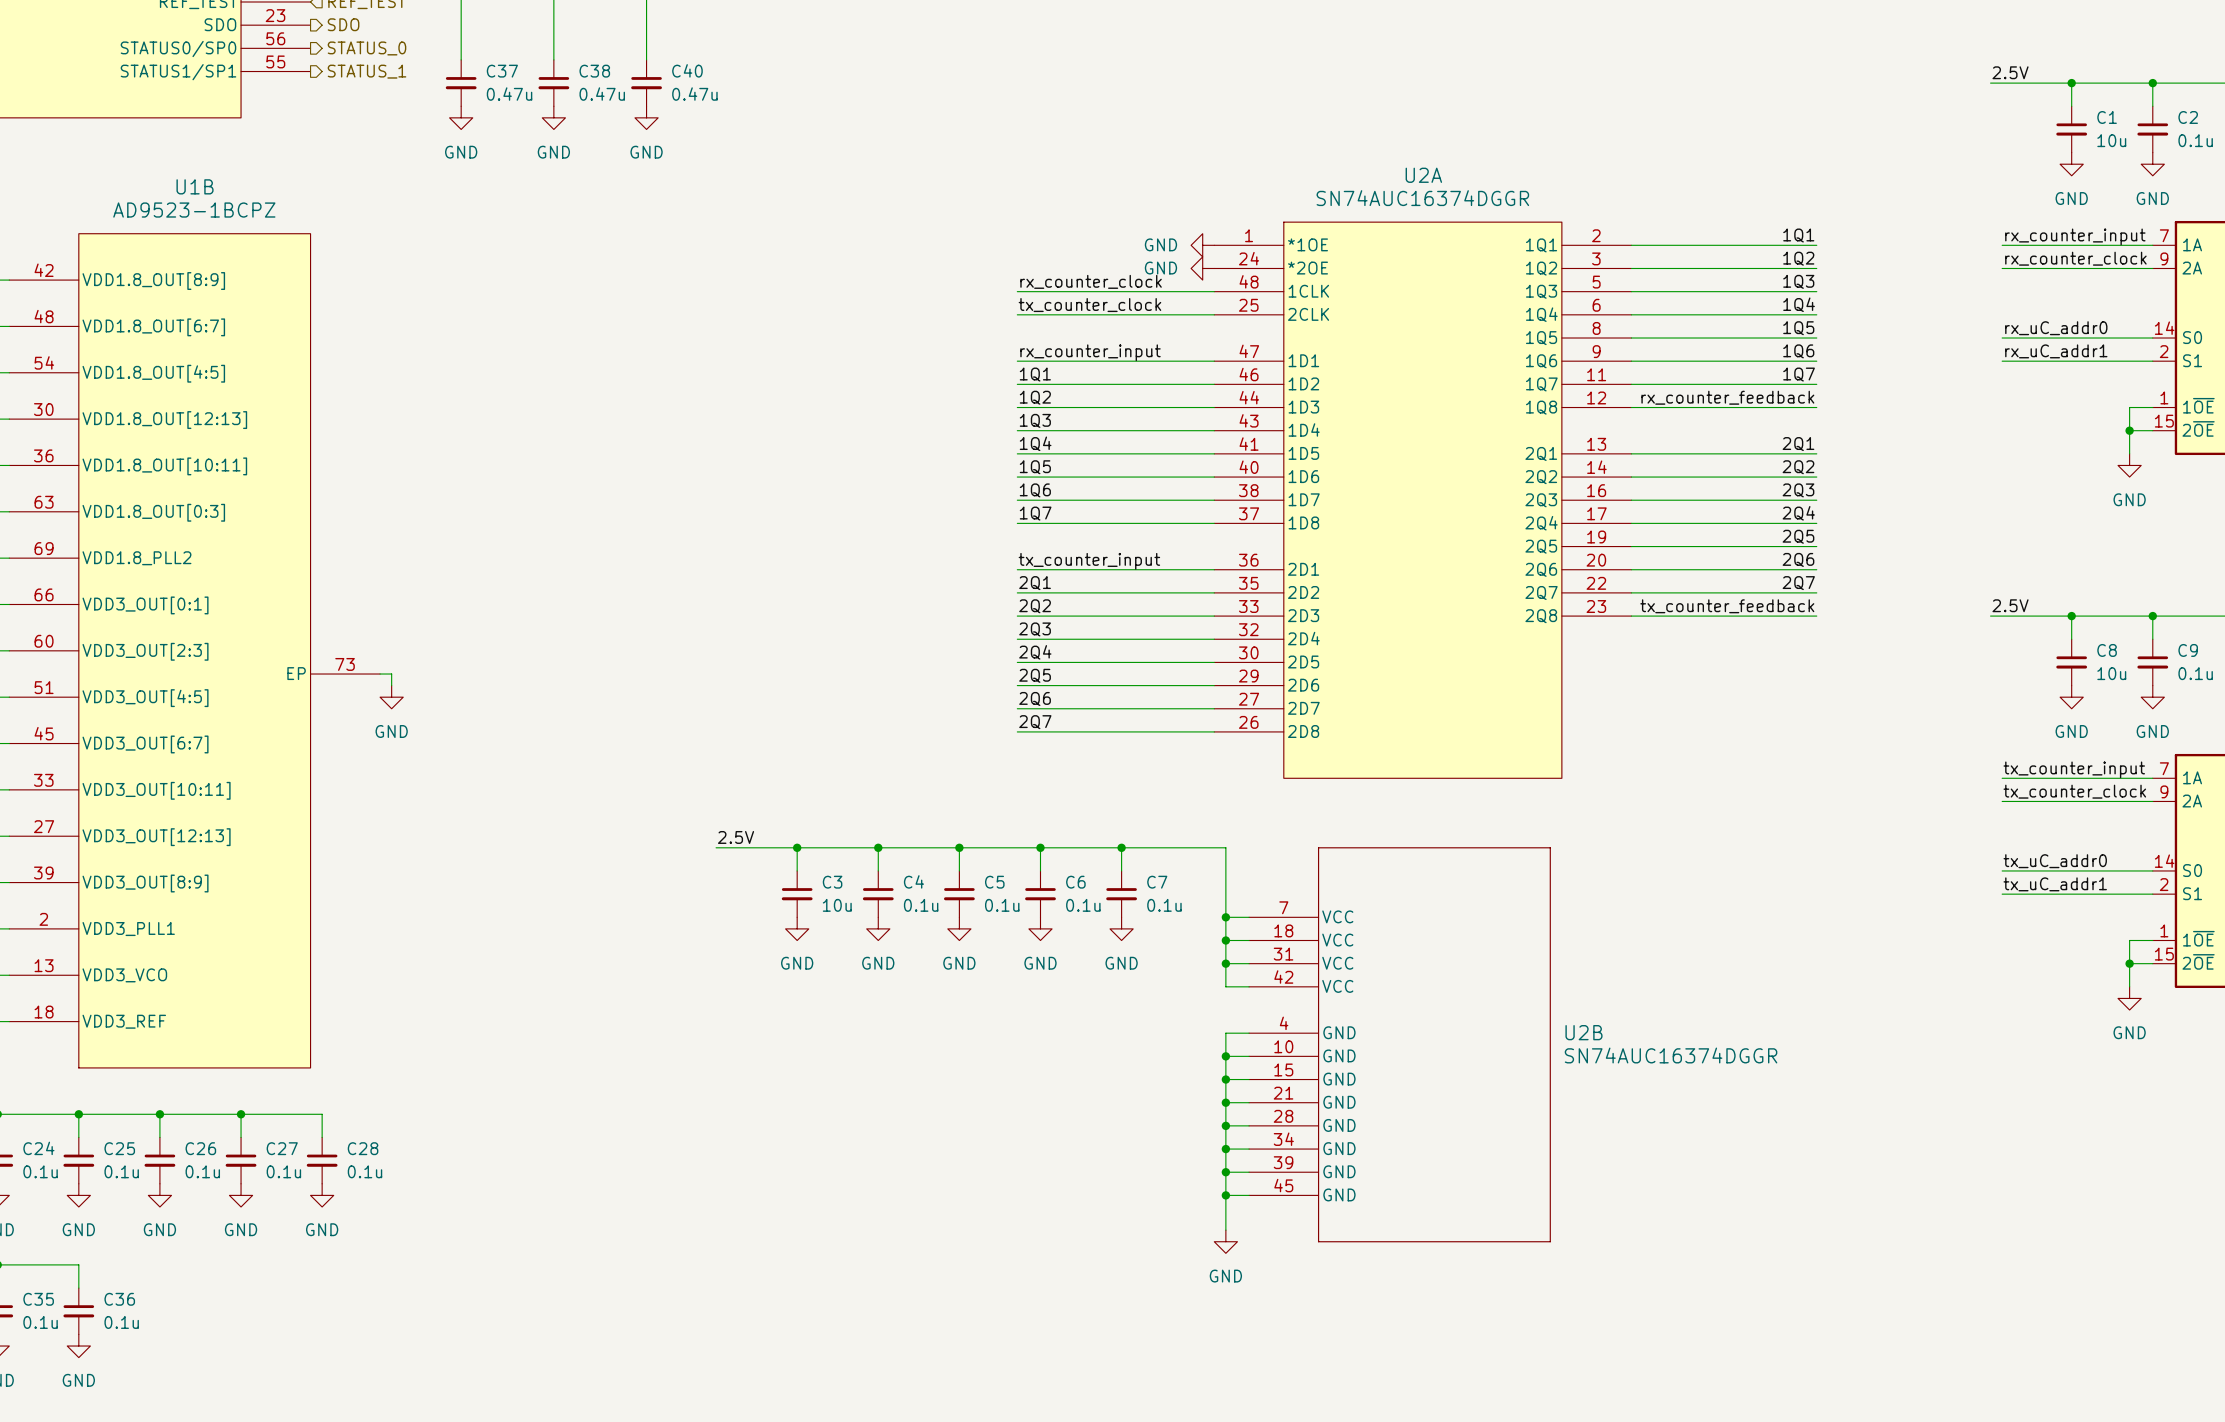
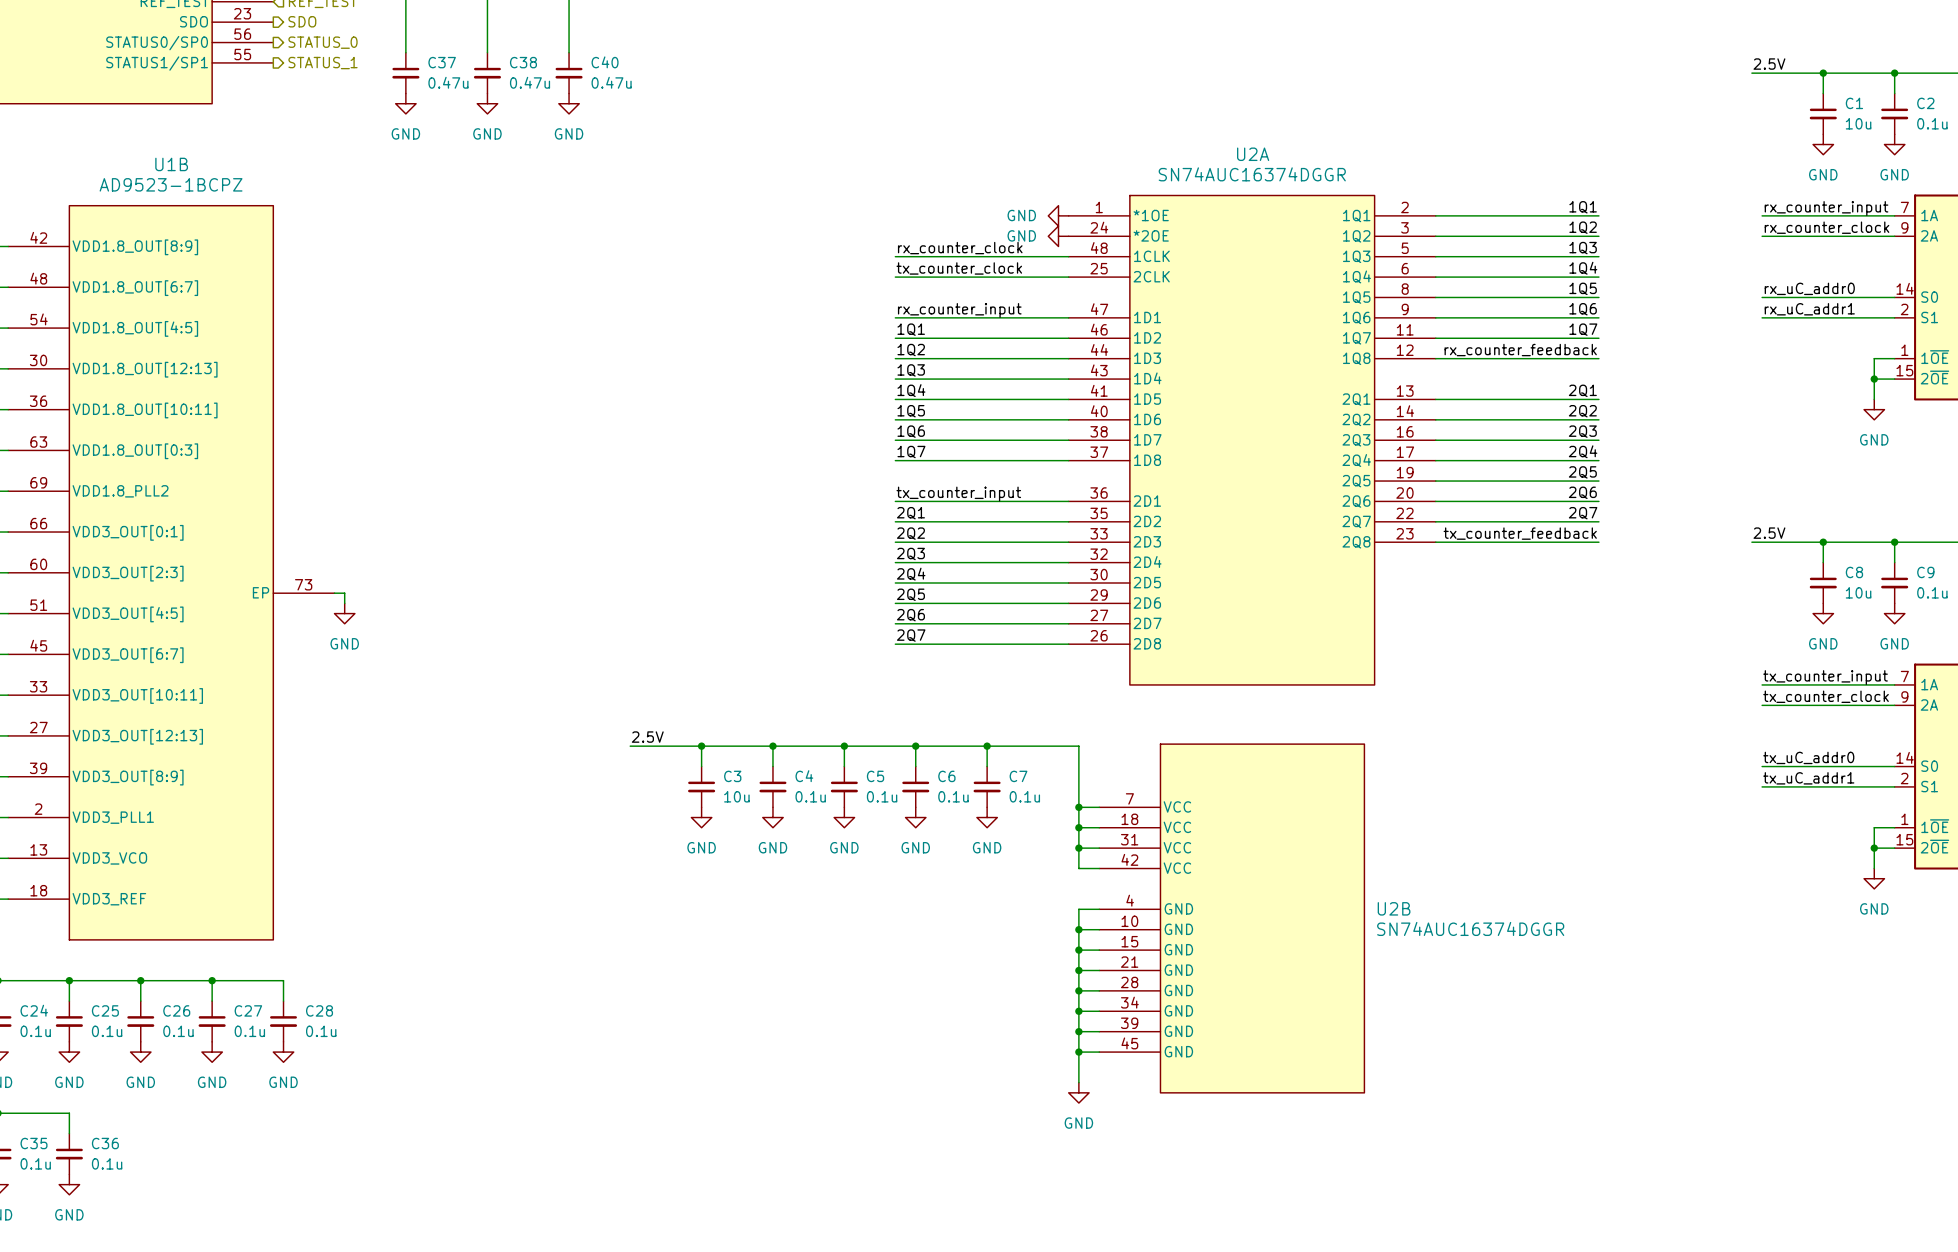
U2B symbol: [1249, 847, 1551, 1243] -> [1099, 744, 1365, 1093]

